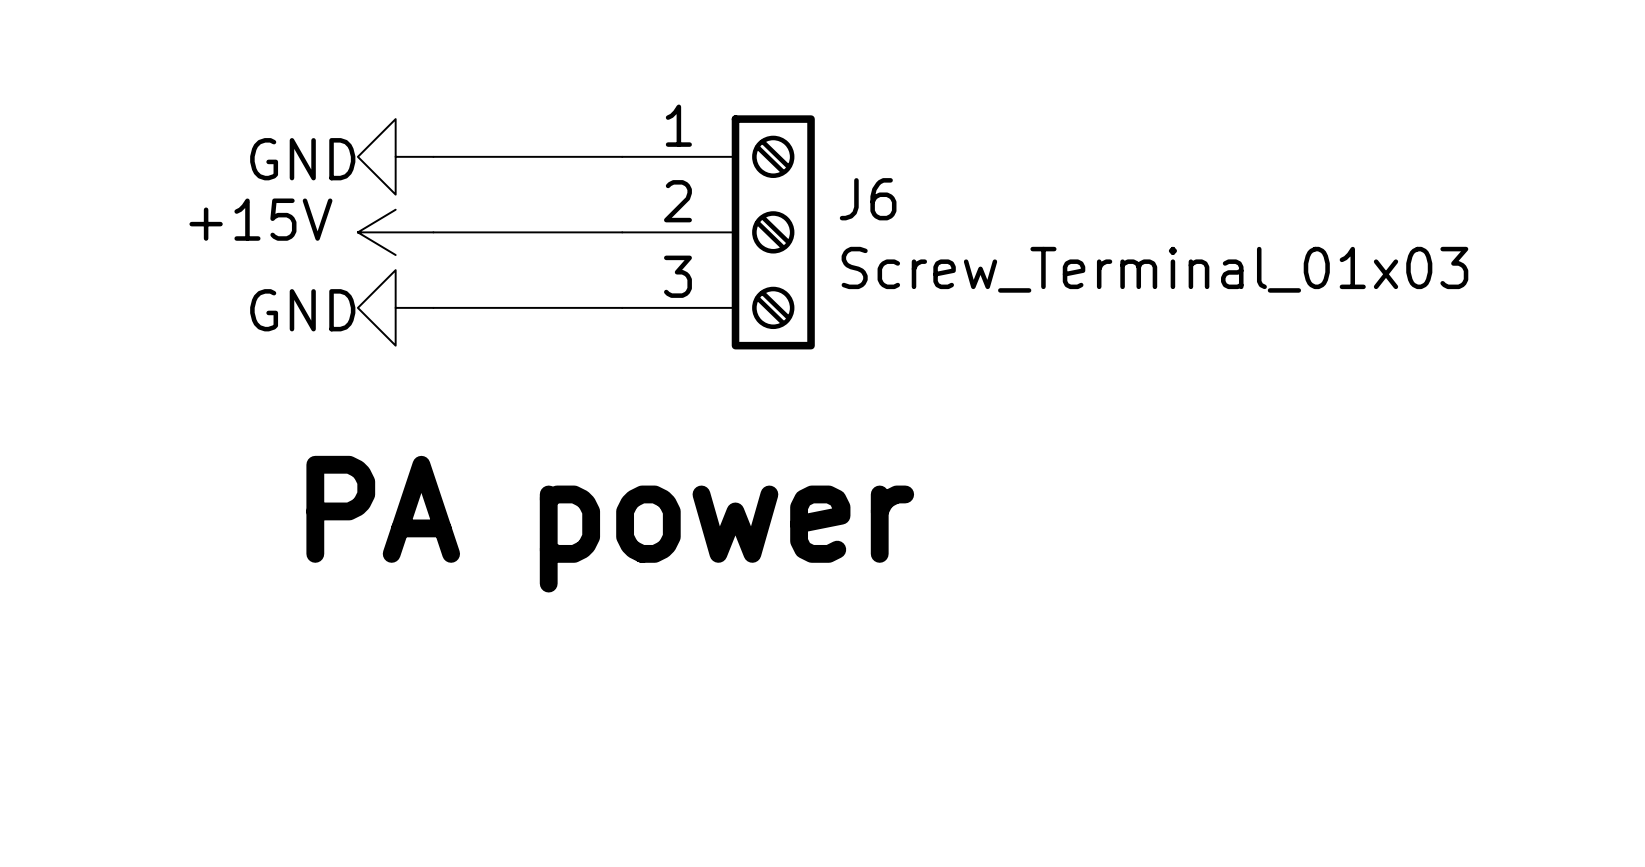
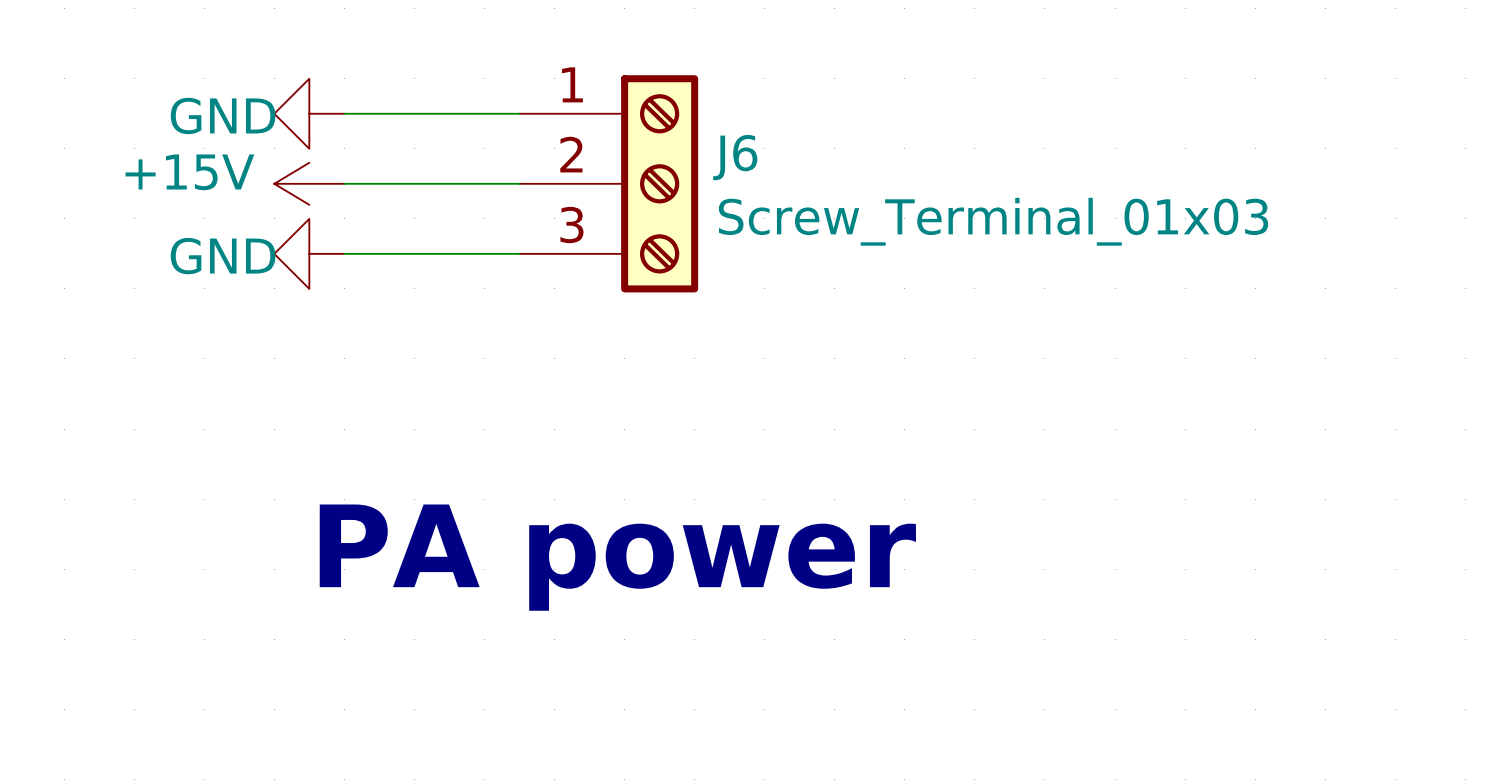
text position: PA power (610, 524) -> PA power (617, 557)

